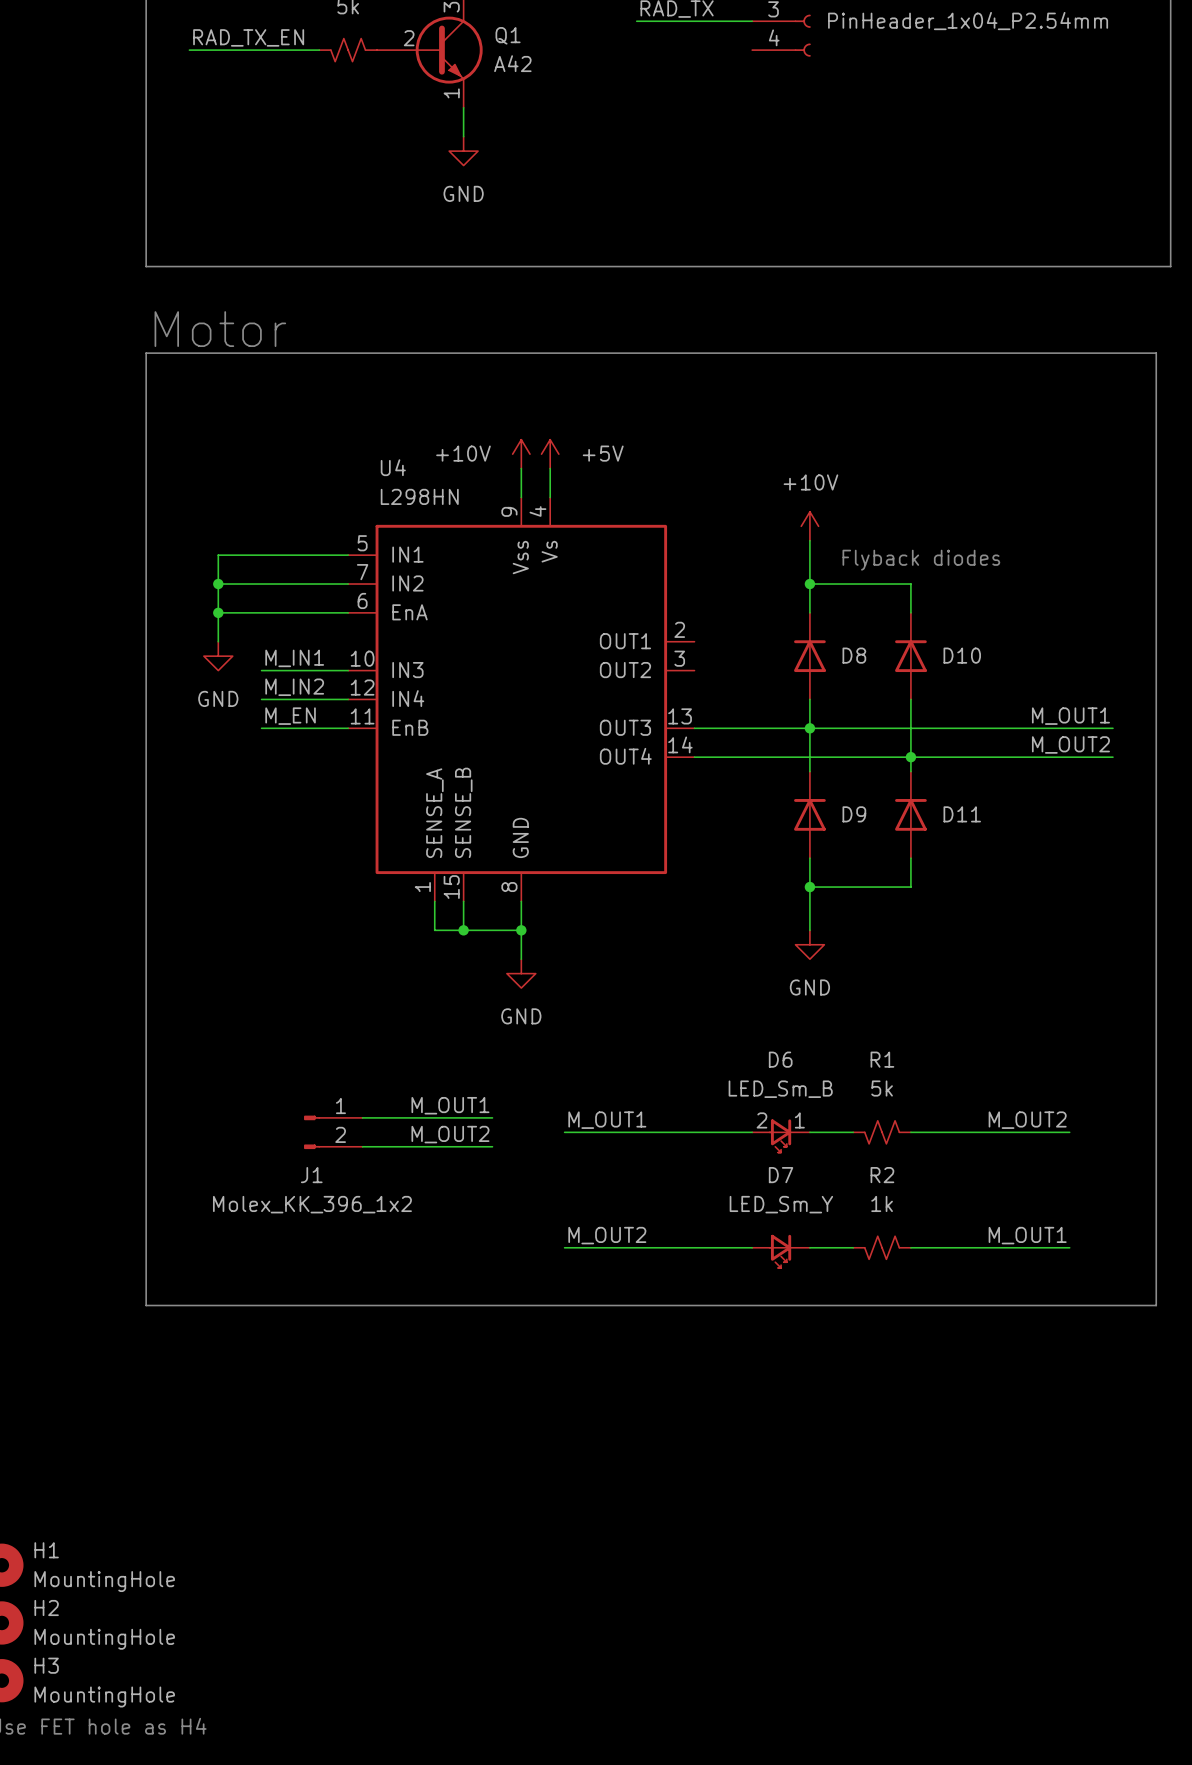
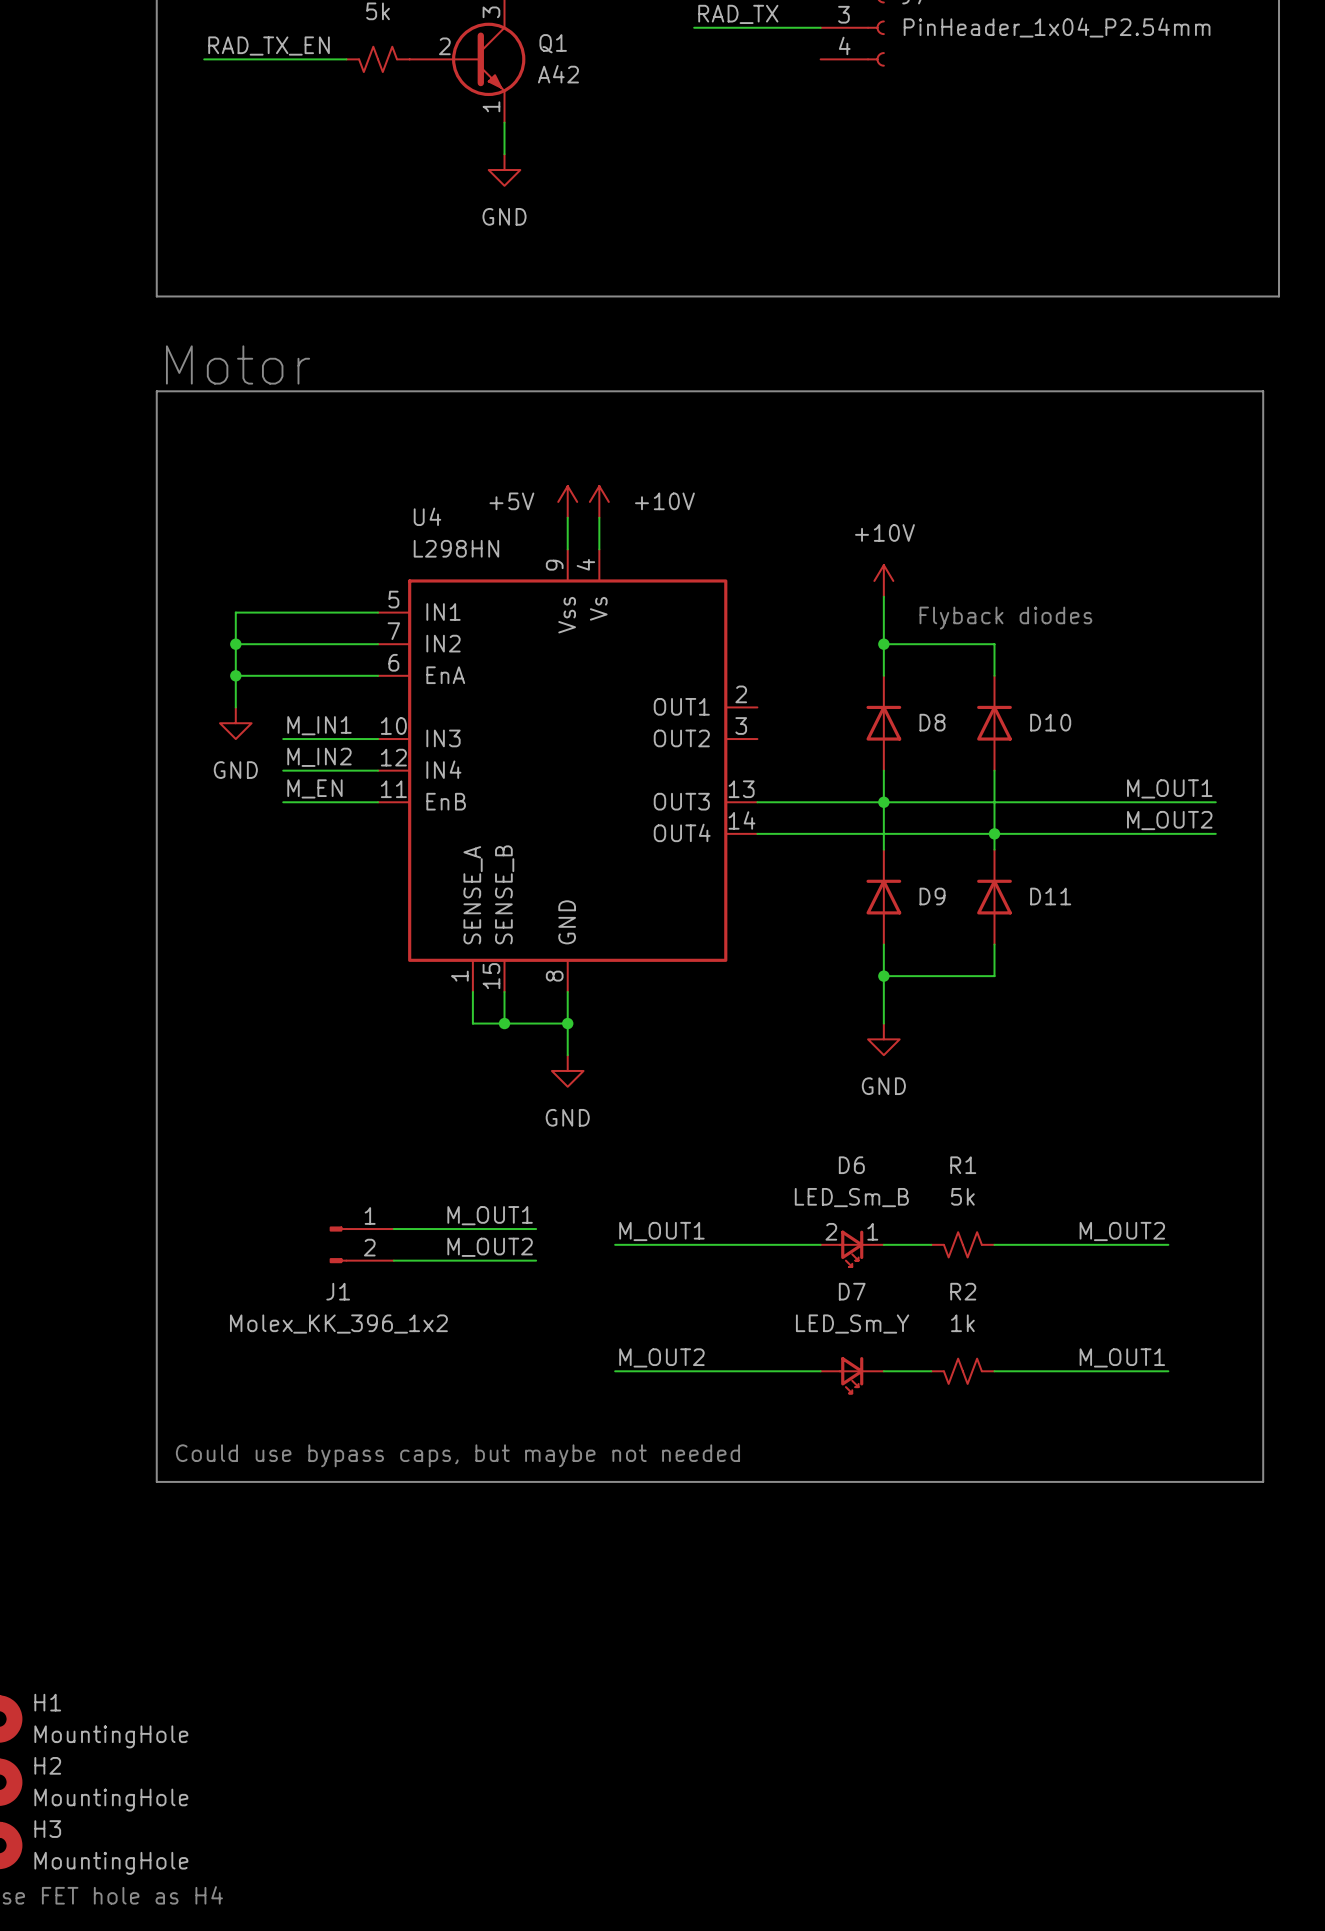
power symbol: +10V (521, 454) -> +5V (567, 501)
power symbol: +5V (550, 454) -> +10V (599, 501)
line: (146, 1305) (1156, 1305) -> (156, 1434) (156, 1481) (1263, 1481) (1263, 1434)
text: none -> Could use bypass caps, but maybe not needed (457, 1455)

